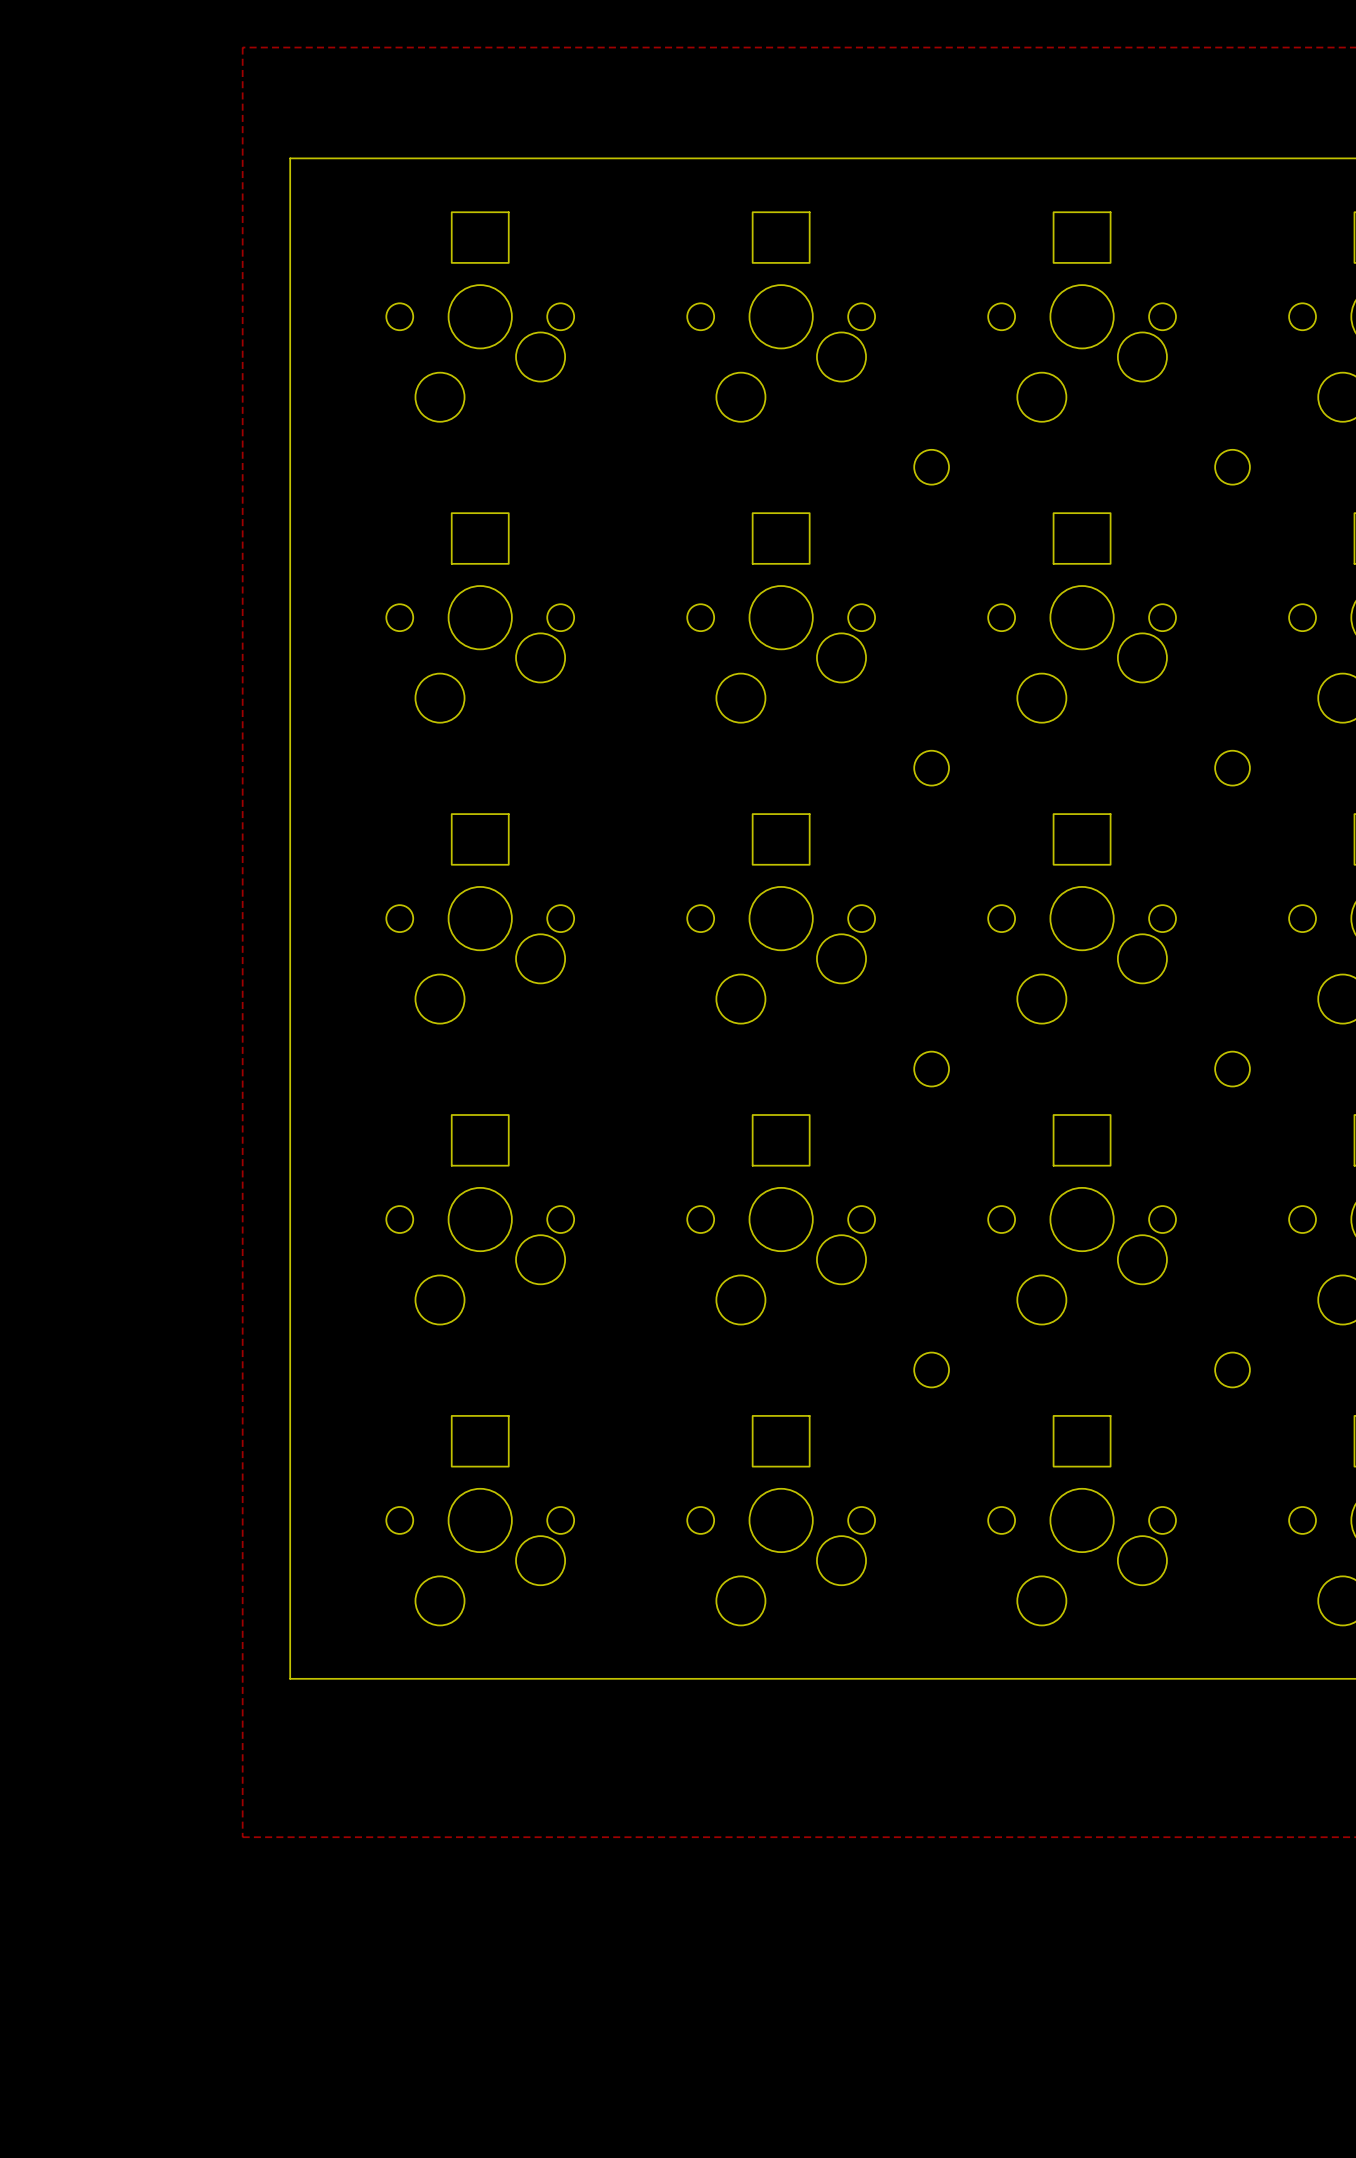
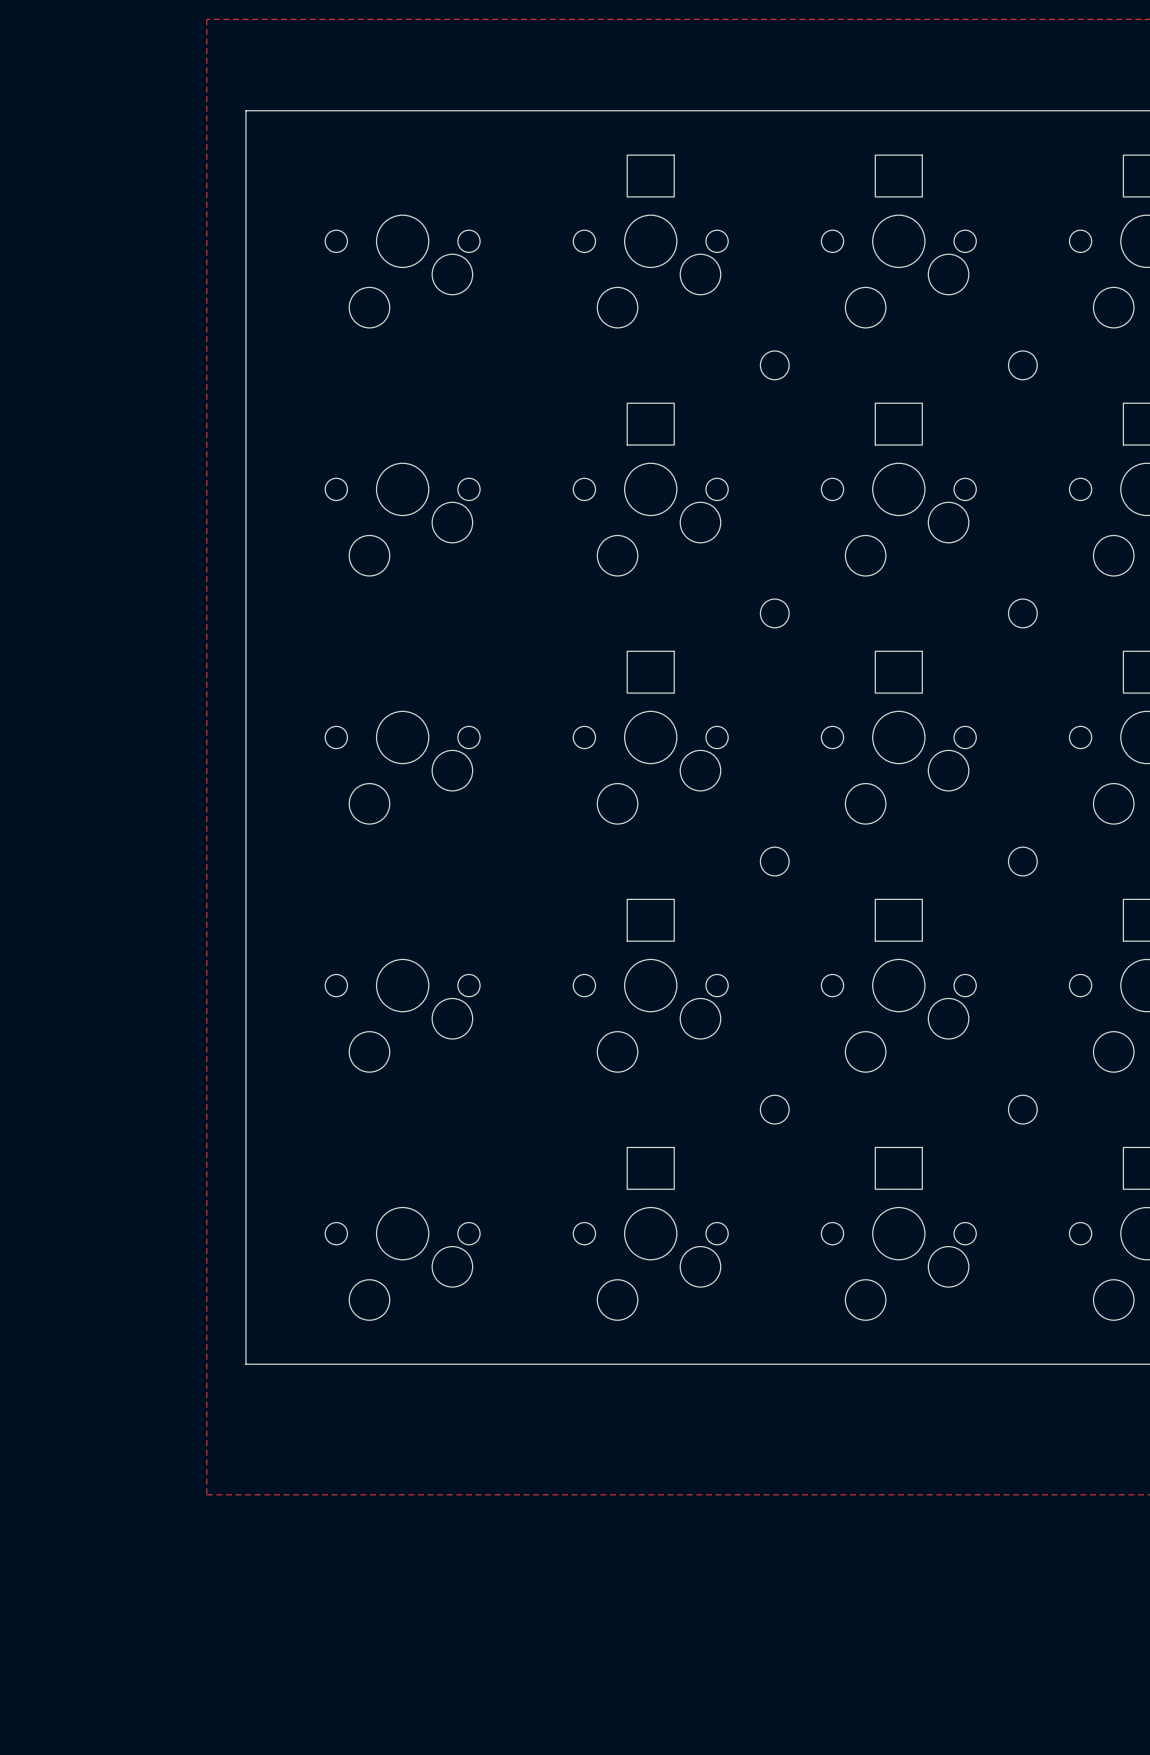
part: (480, 237) -> none
part: (480, 538) -> none
part: (480, 839) -> none
part: (480, 1140) -> none
part: (480, 1441) -> none

